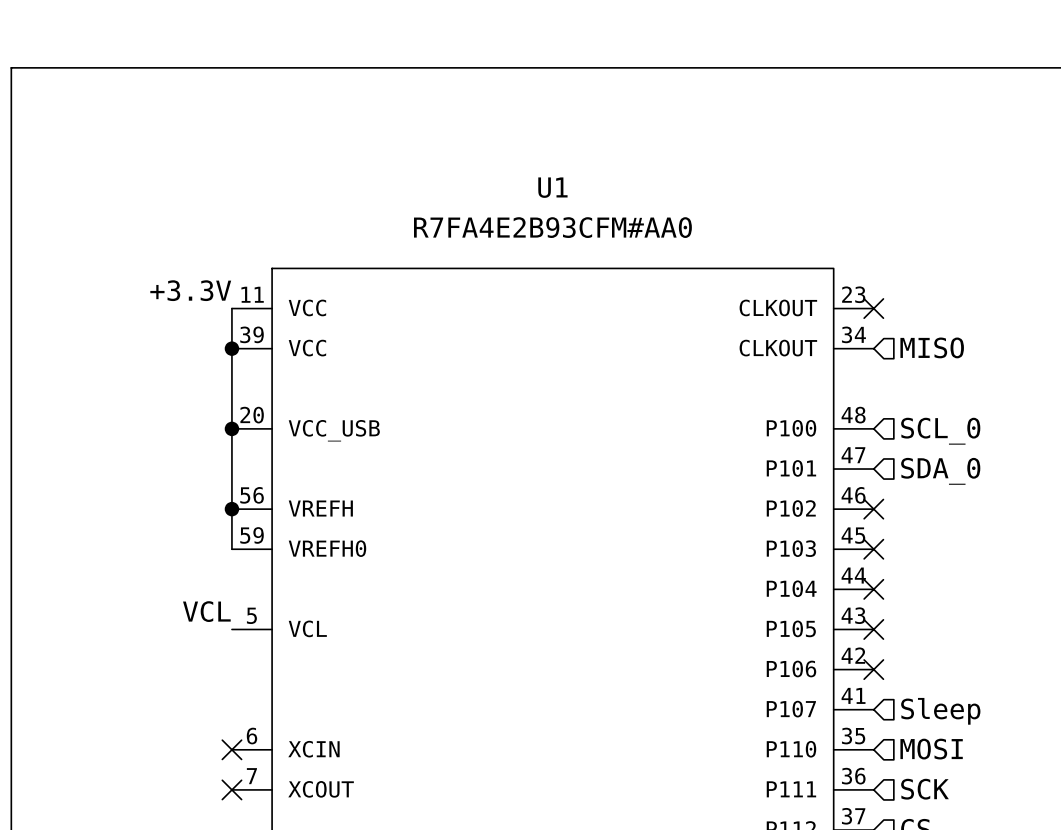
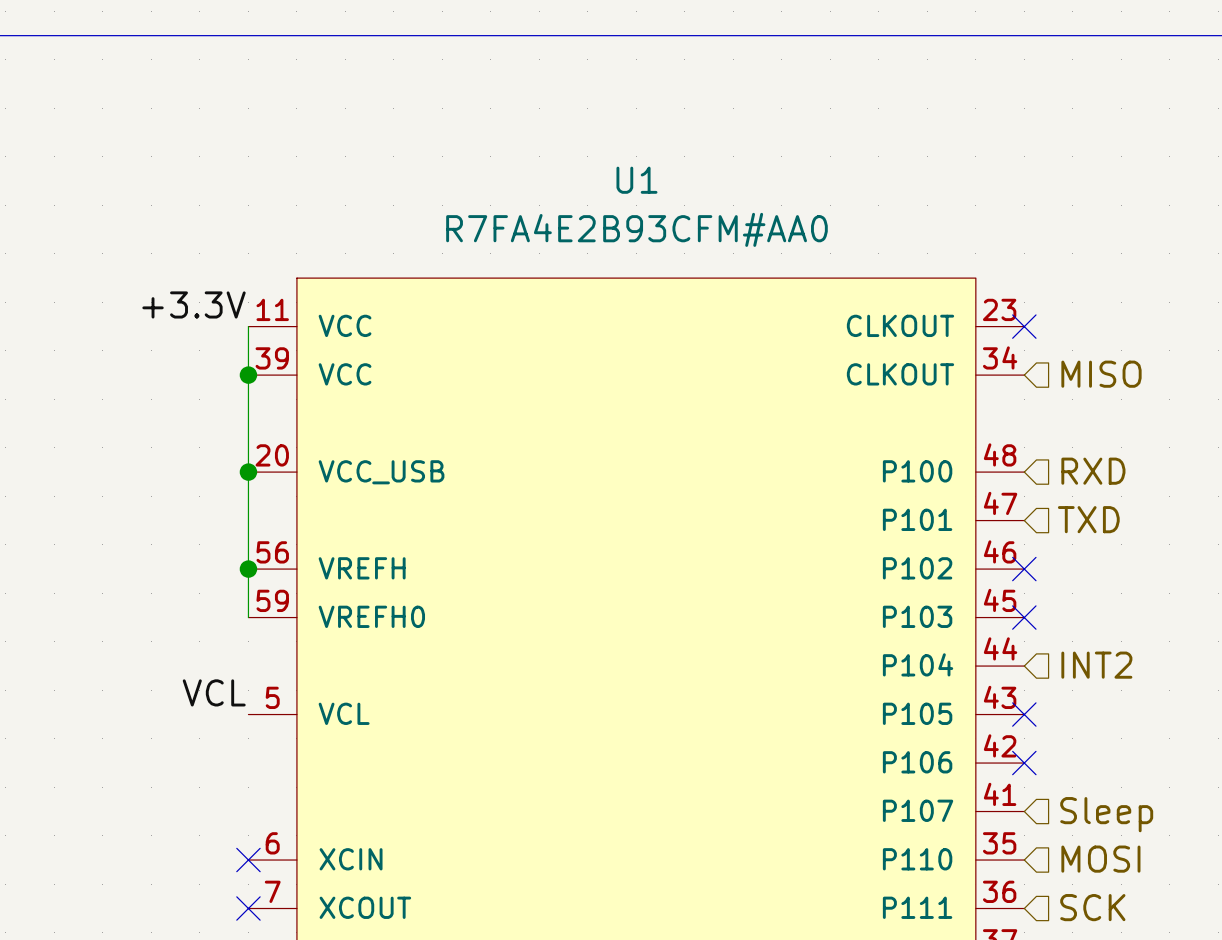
hierarchical label: SCL_0 (940, 431) -> RXD (1093, 471)
hierarchical label: SDA_0 (940, 471) -> TXD (1088, 519)
hierarchical label: none -> INT2 (1096, 665)
no-connect mark: (873, 589) -> none

